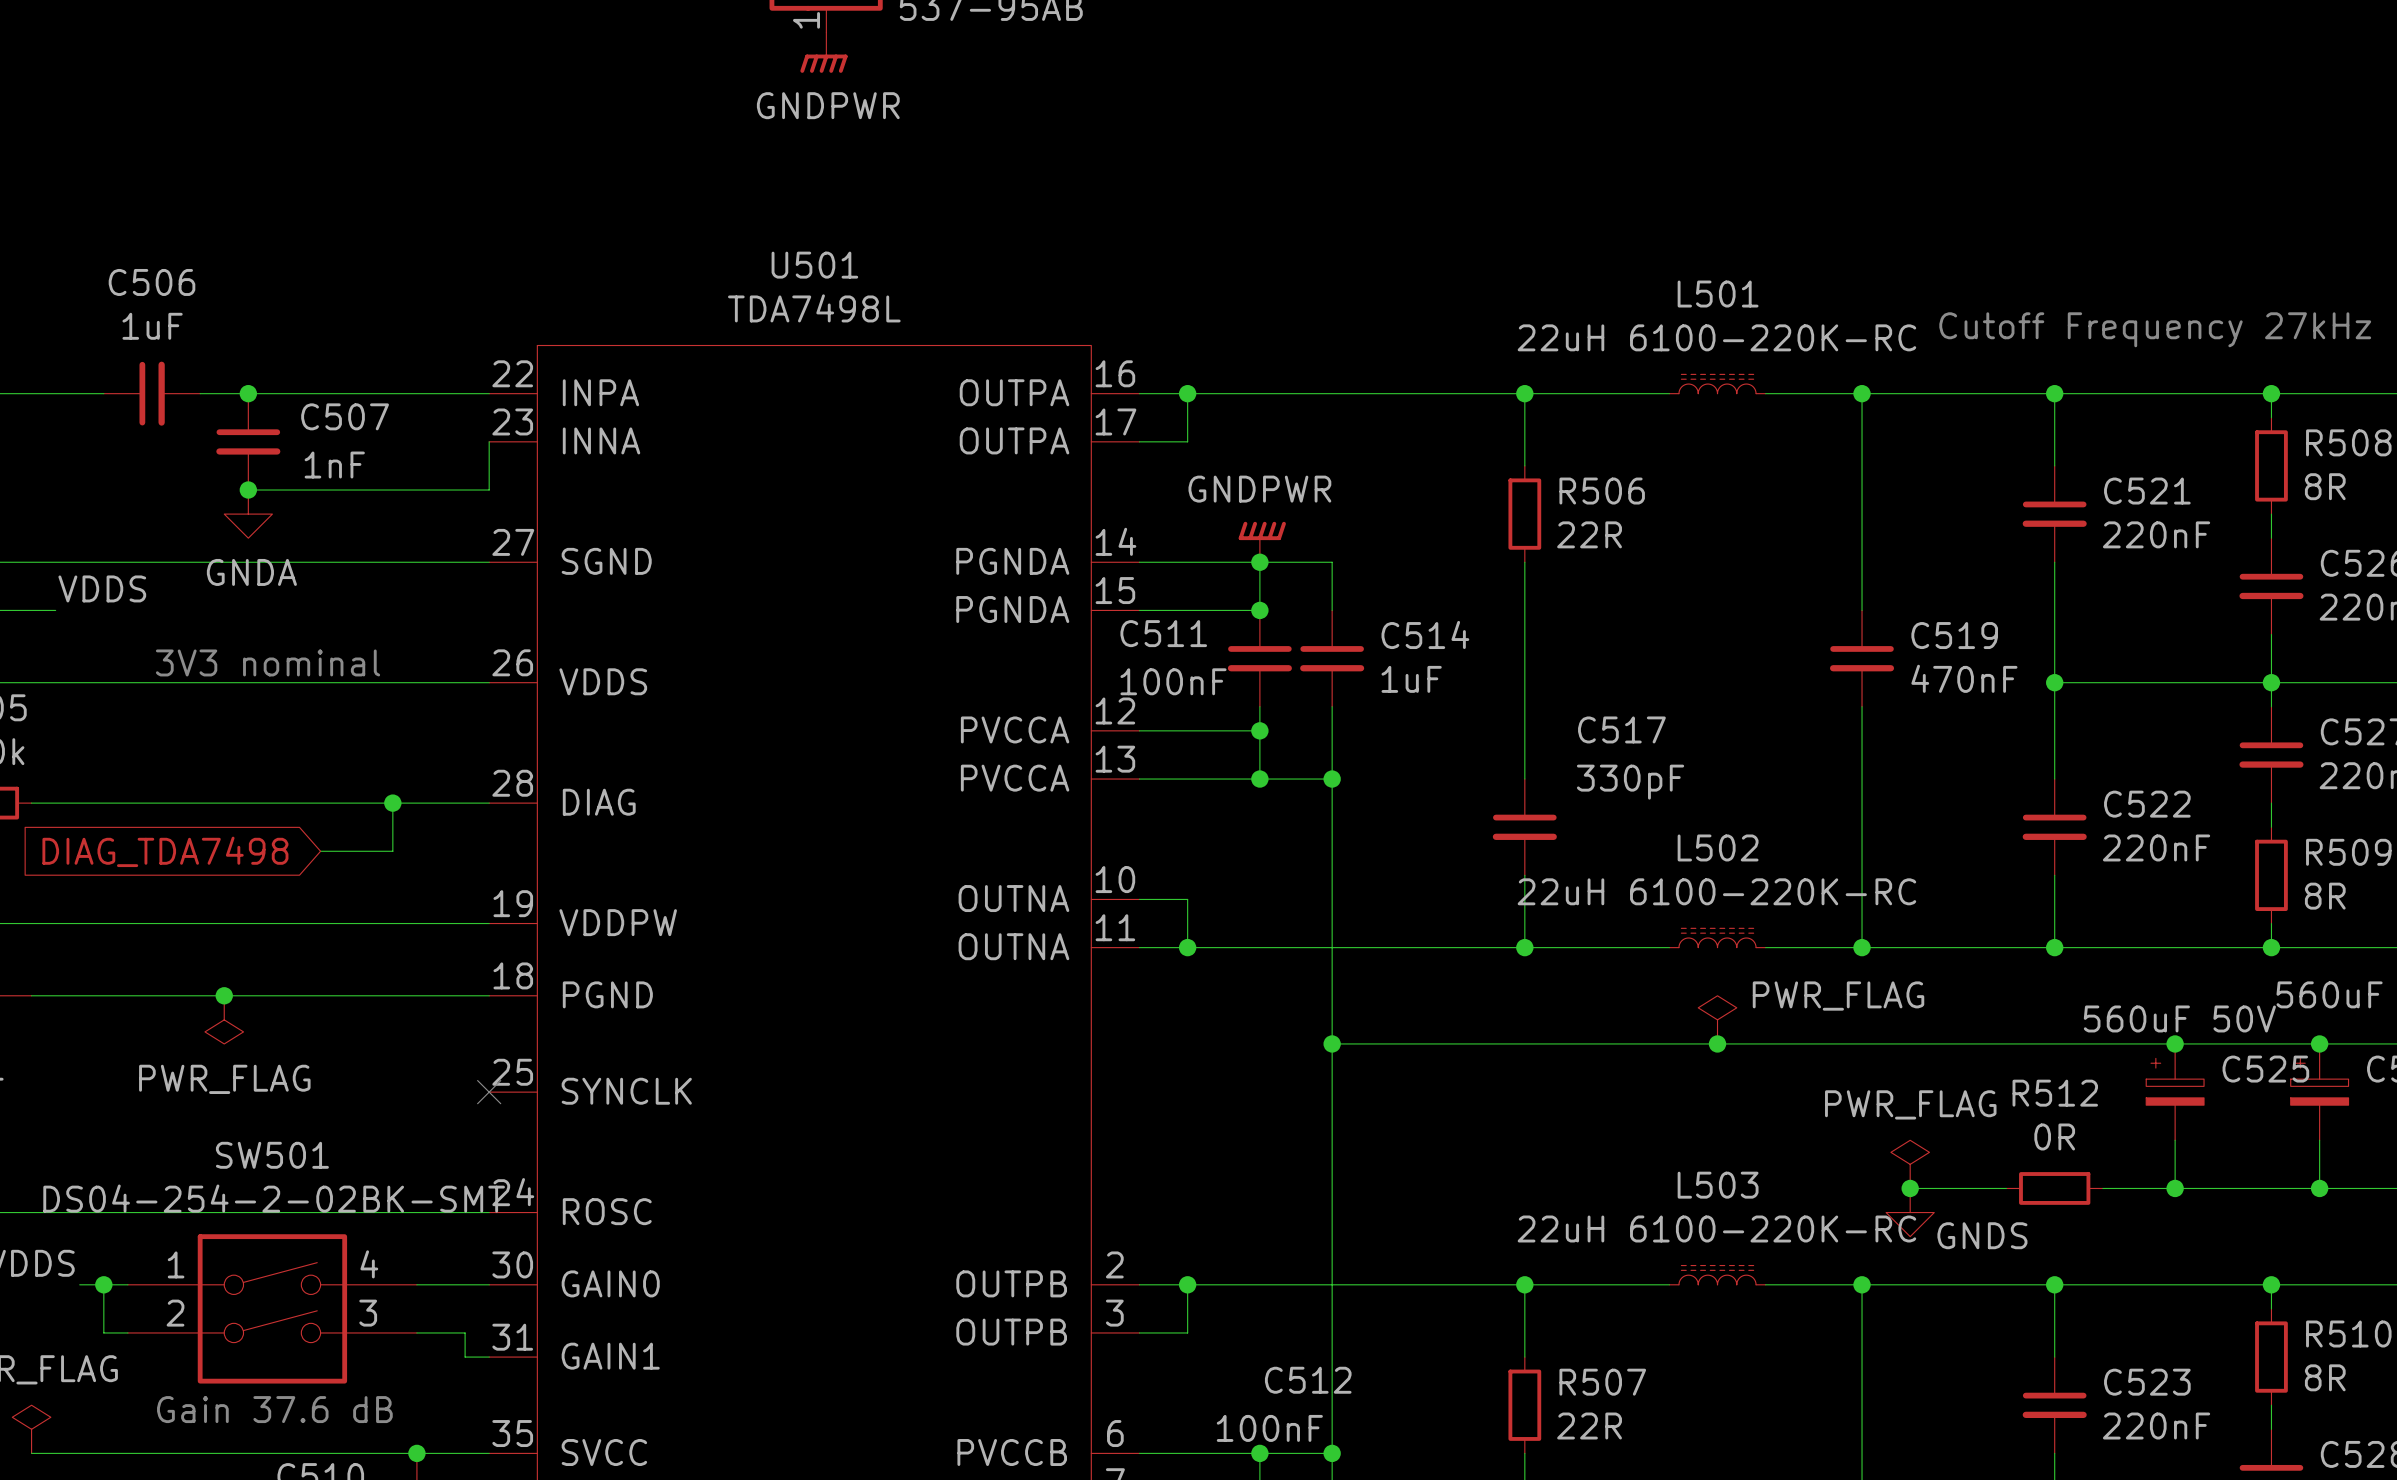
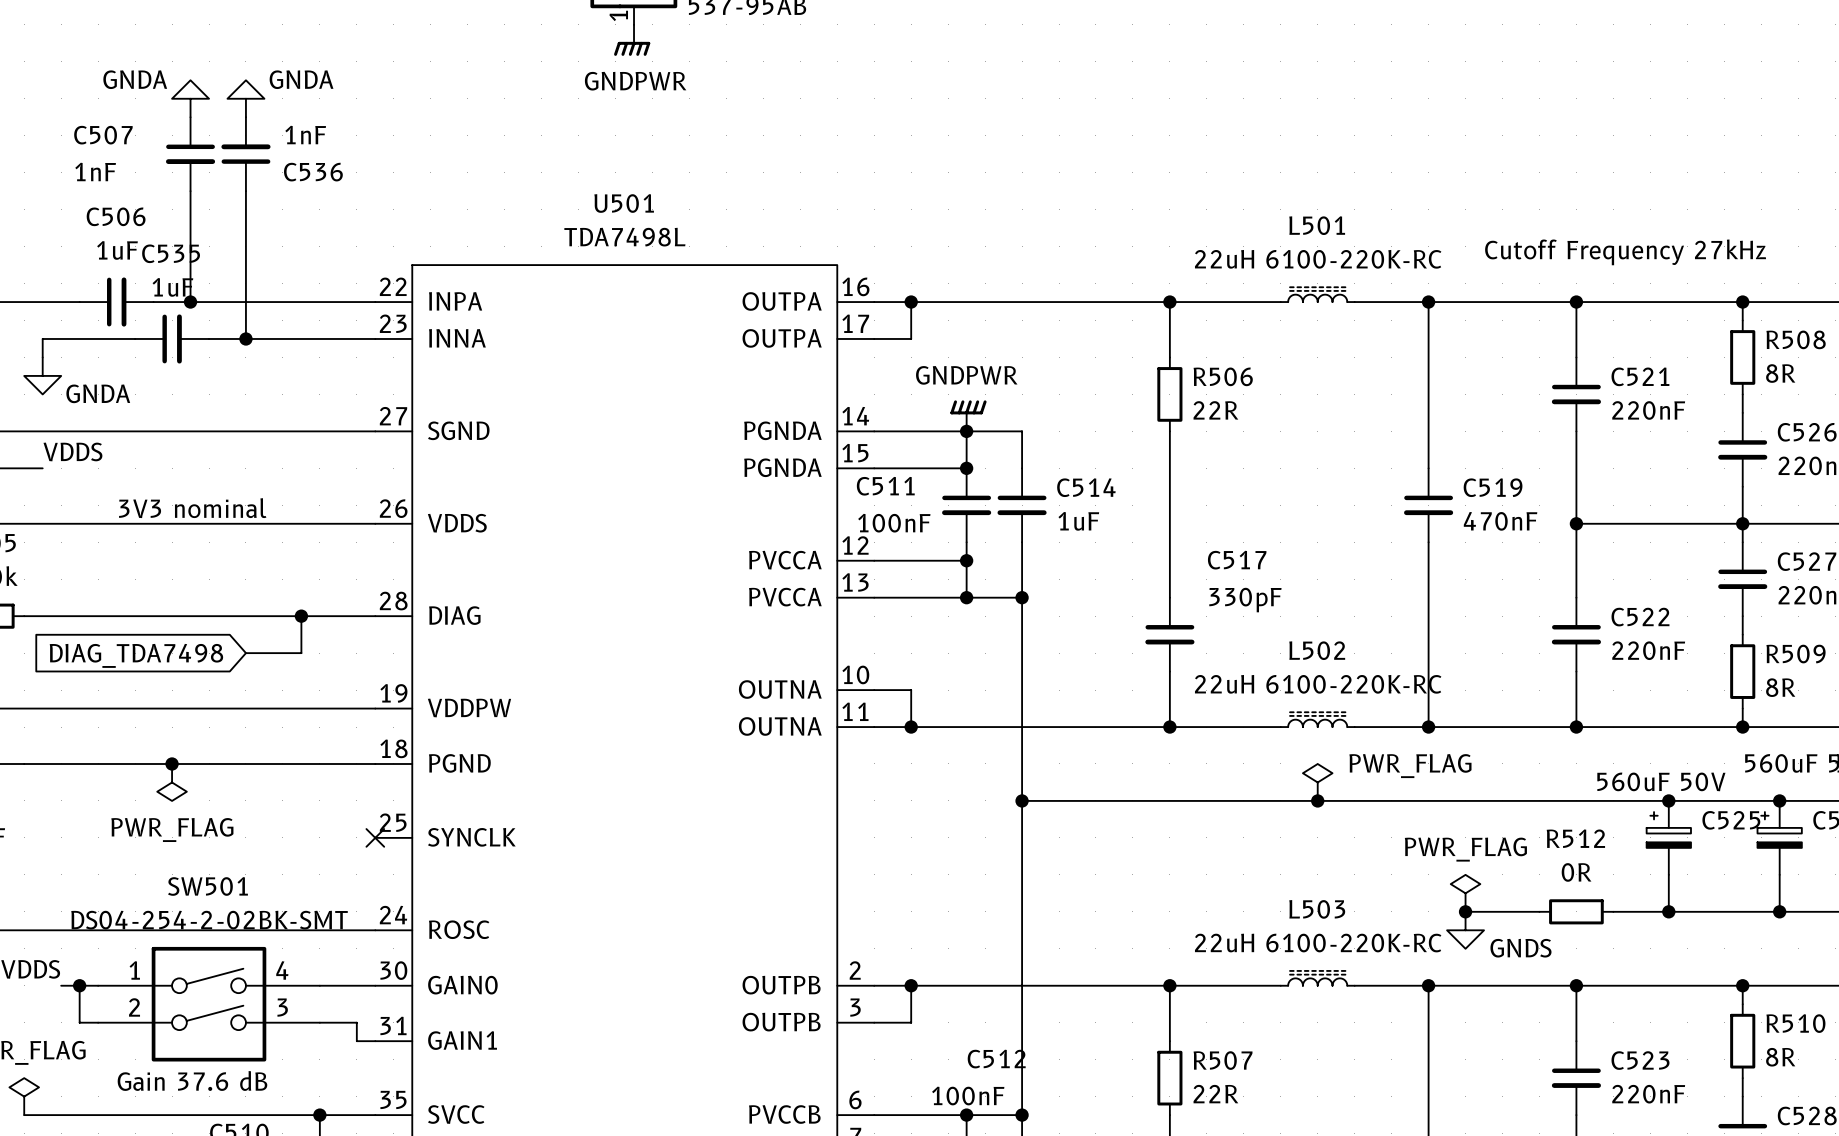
power symbol: none -> GNDA (190, 98)
power symbol: none -> GNDA (245, 98)
C536: none -> 1nF (245, 154)
wire: none -> (190, 191) (190, 302)
wire: none -> (245, 191) (245, 338)
C507 name position: C507 (345, 416) -> C507 (103, 135)
wire: none -> (135, 338) (42, 338) (42, 357)
C535: none -> 1uF (172, 338)
C507 position: (248, 441) -> (190, 154)
wire: (489, 441) (489, 490) (248, 490) -> (375, 338) (209, 338)
C507 value position: 1nF (334, 465) -> 1nF (95, 171)
power symbol: none -> GNDA (42, 375)
junction position: (248, 490) -> (245, 338)
power symbol: GNDA (248, 514) -> none

